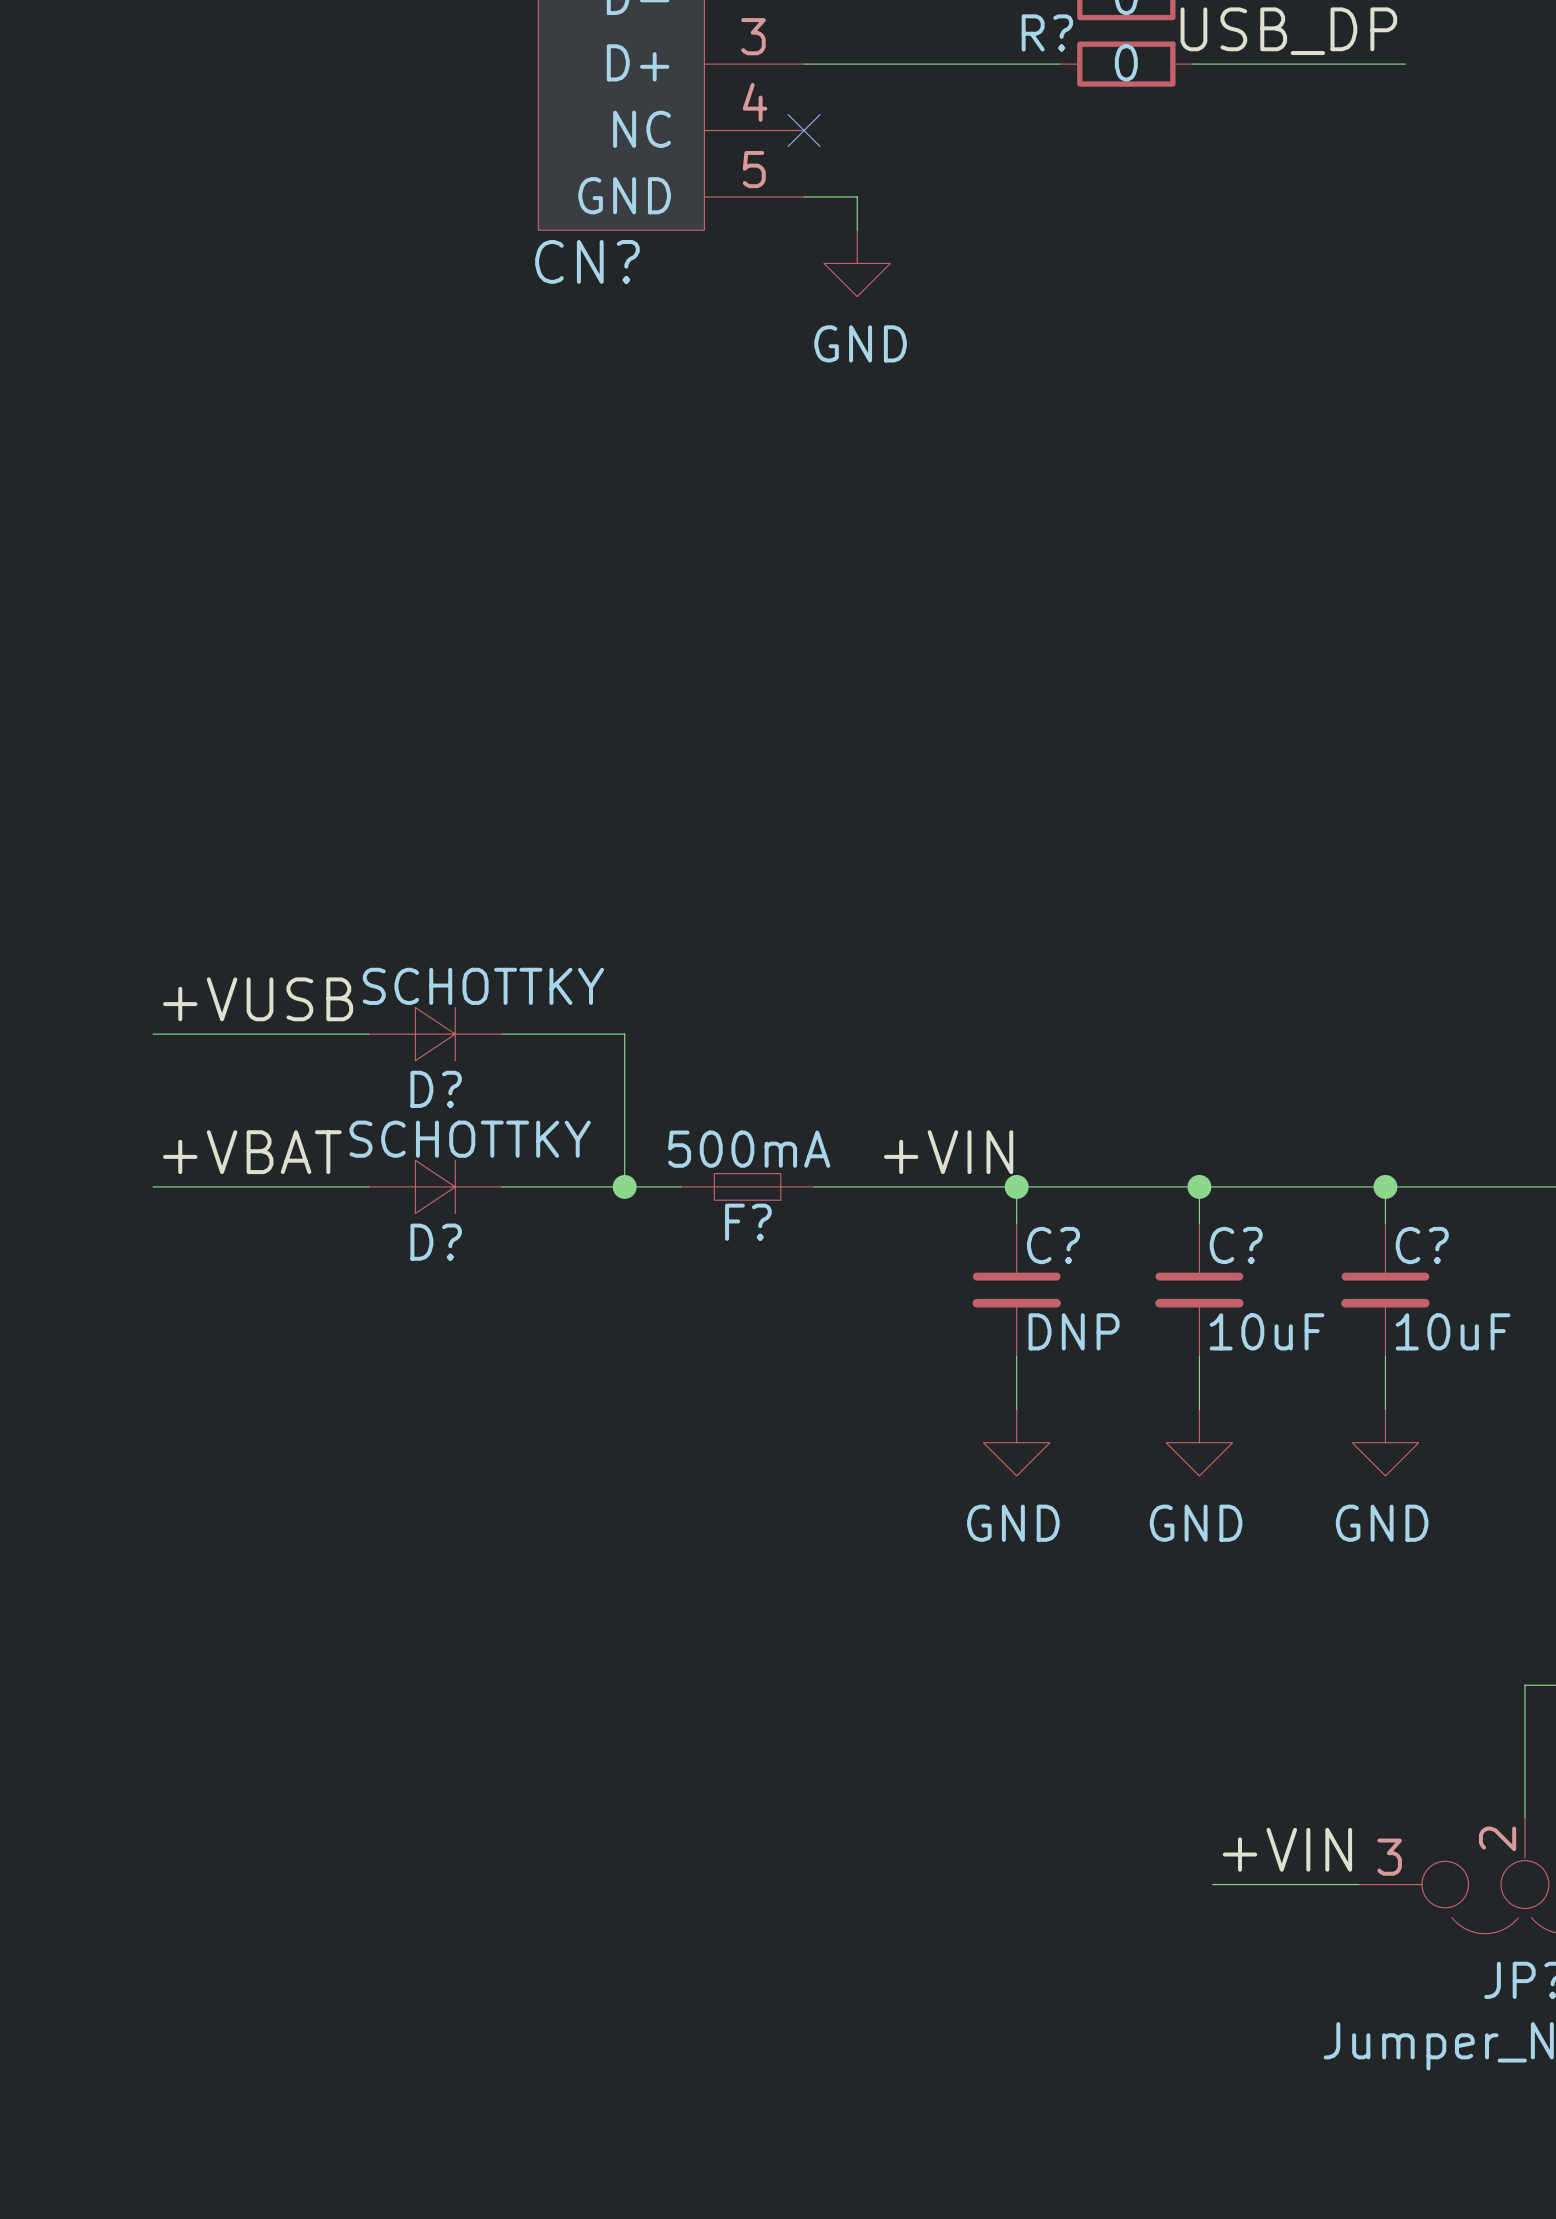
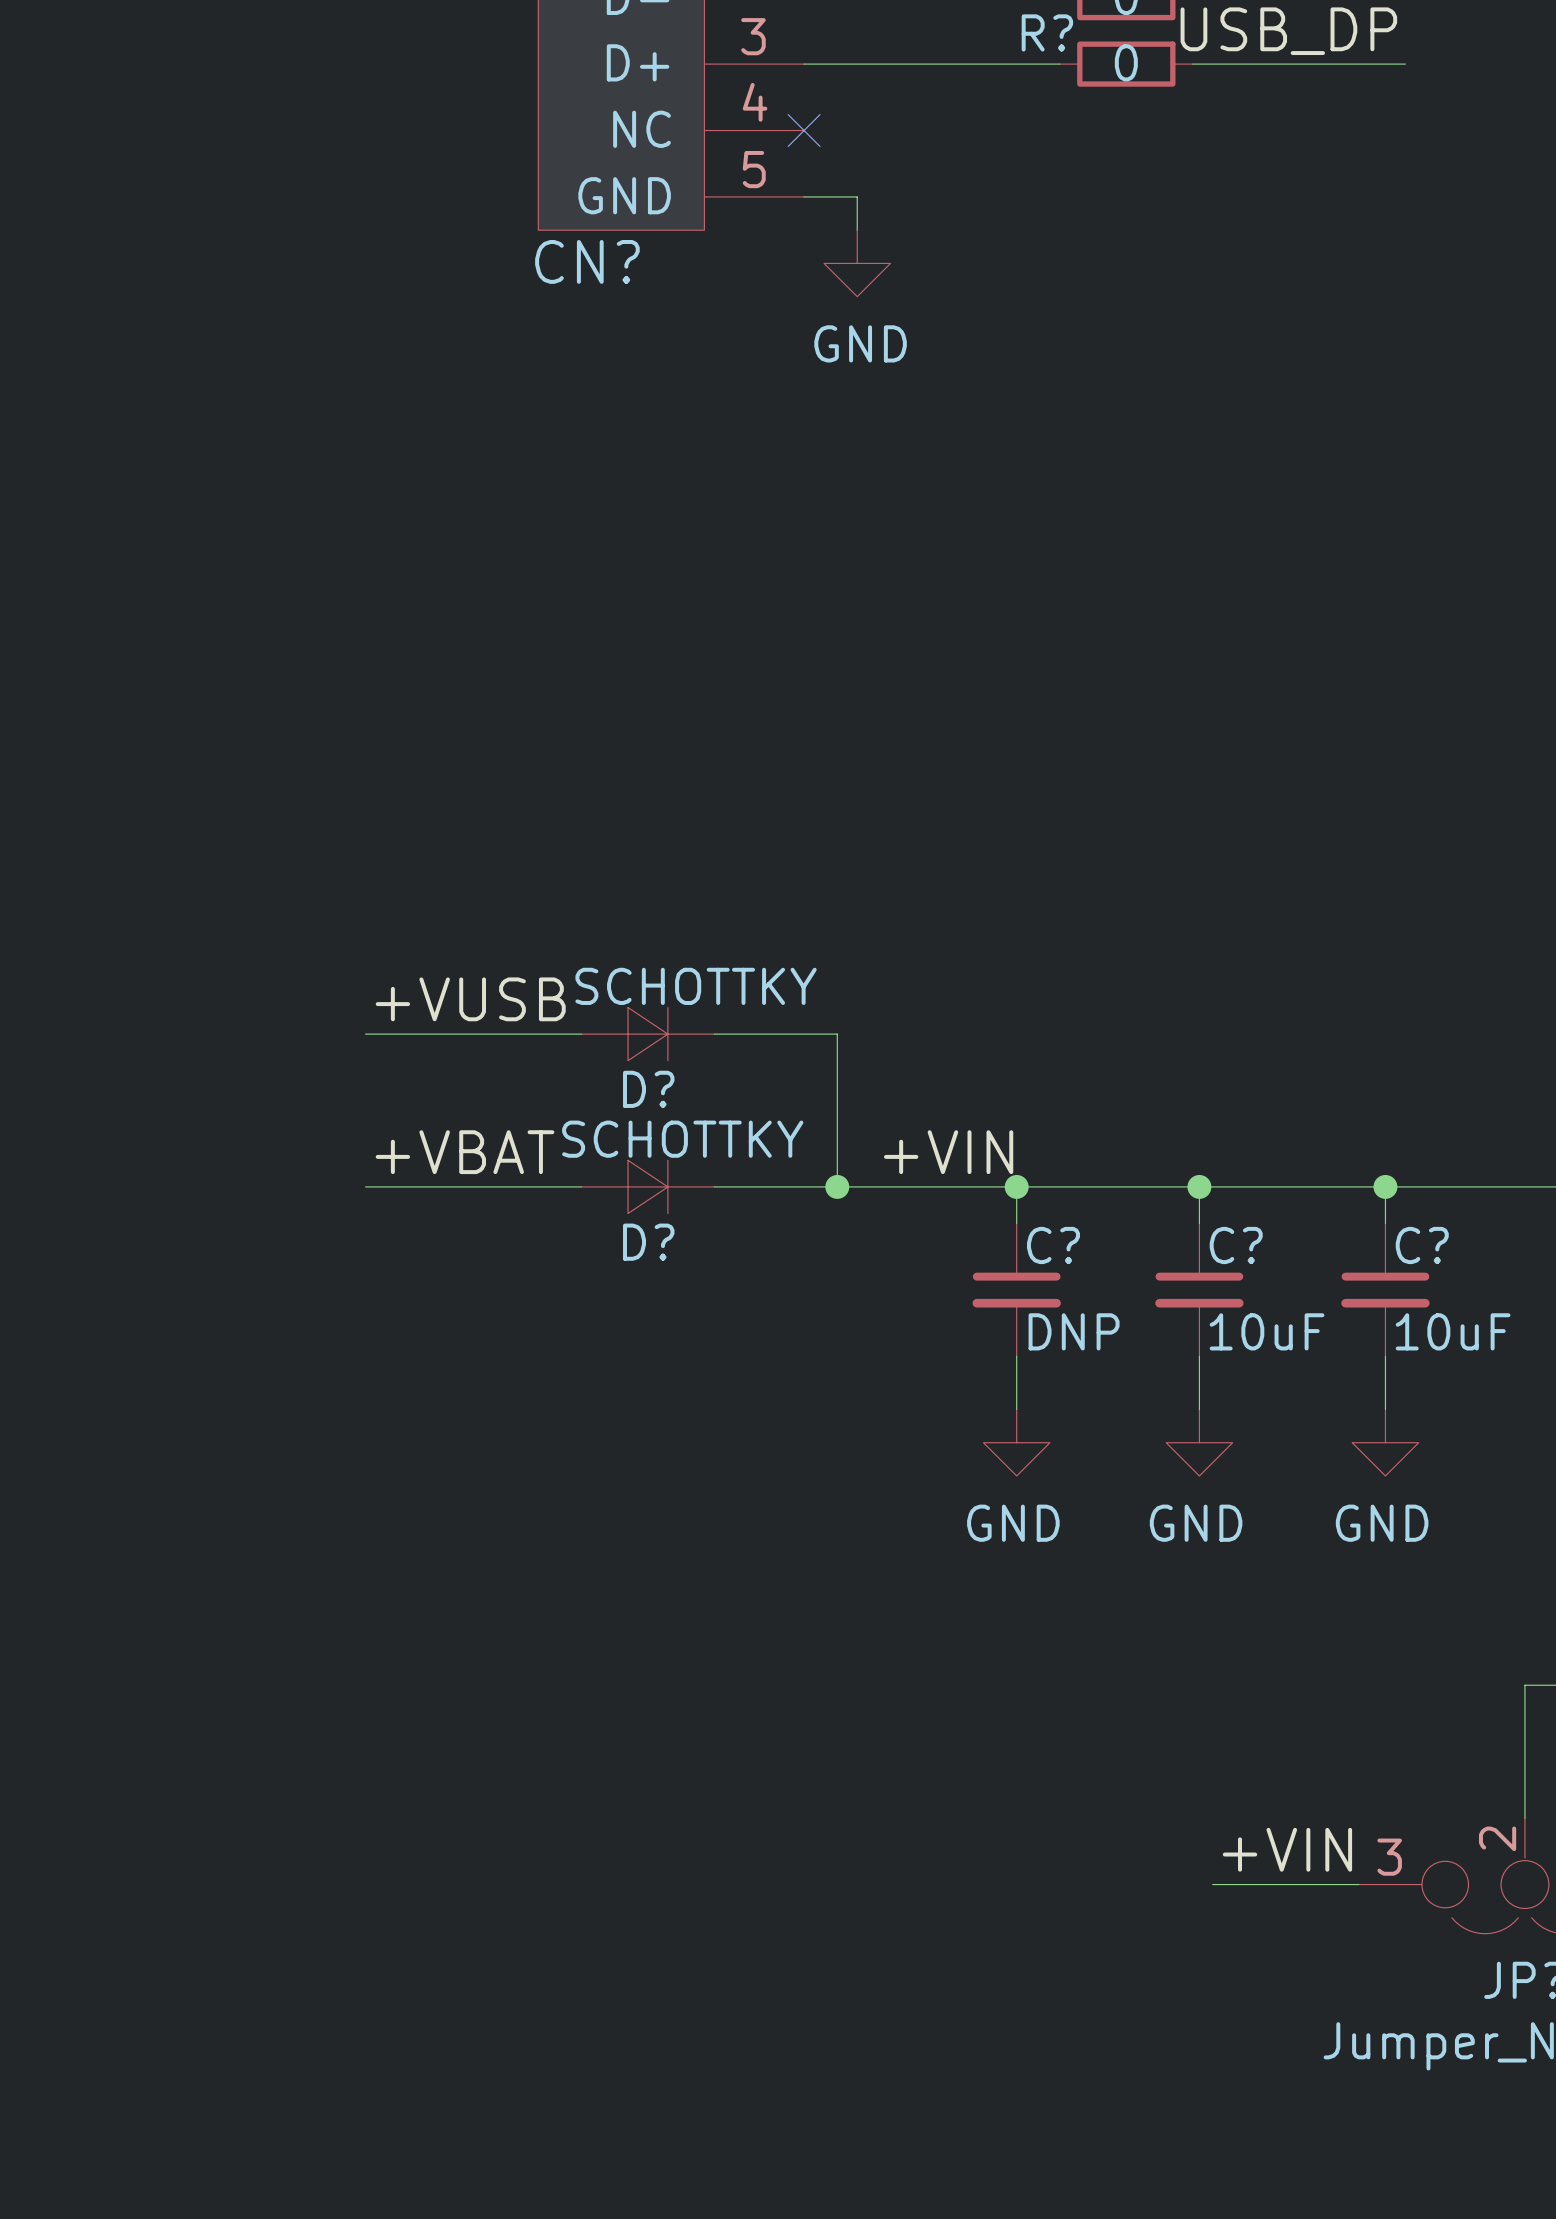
label position: +VUSB (258, 999) -> +VUSB (470, 999)
wire: (152, 1034) (365, 1034) -> none
D?: SCHOTTKY (435, 1034) -> none
wire: (581, 1034) (624, 1034) (624, 1186) -> none
D?: none -> SCHOTTKY (647, 1034)
wire: none -> (714, 1034) (837, 1034) (837, 1186)
label position: +VBAT (252, 1152) -> +VBAT (465, 1152)
wire: (152, 1186) (365, 1186) -> none
D?: SCHOTTKY (435, 1186) -> none
junction: (624, 1186) -> none
D?: none -> SCHOTTKY (647, 1186)
F?: 500mA (747, 1186) -> none
junction: none -> (837, 1186)

